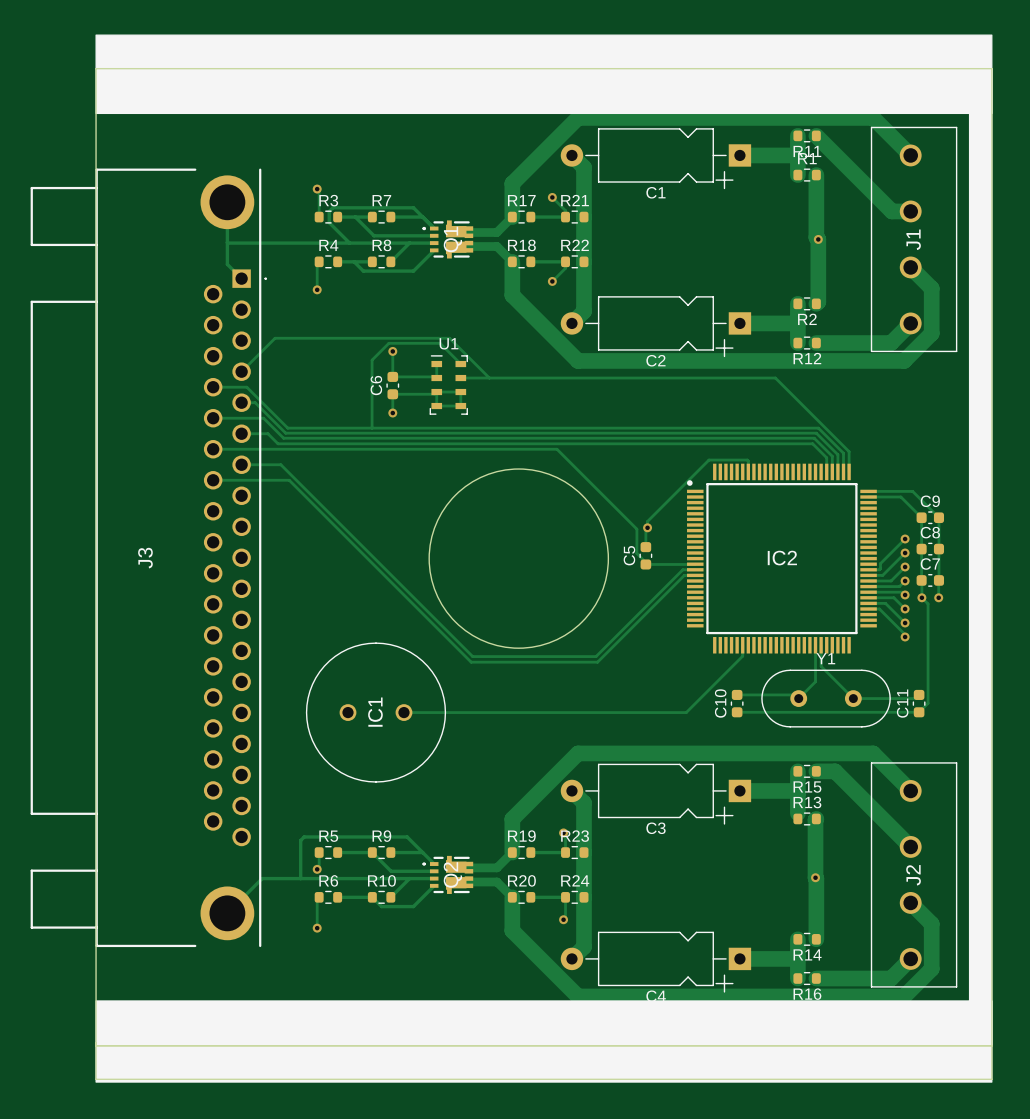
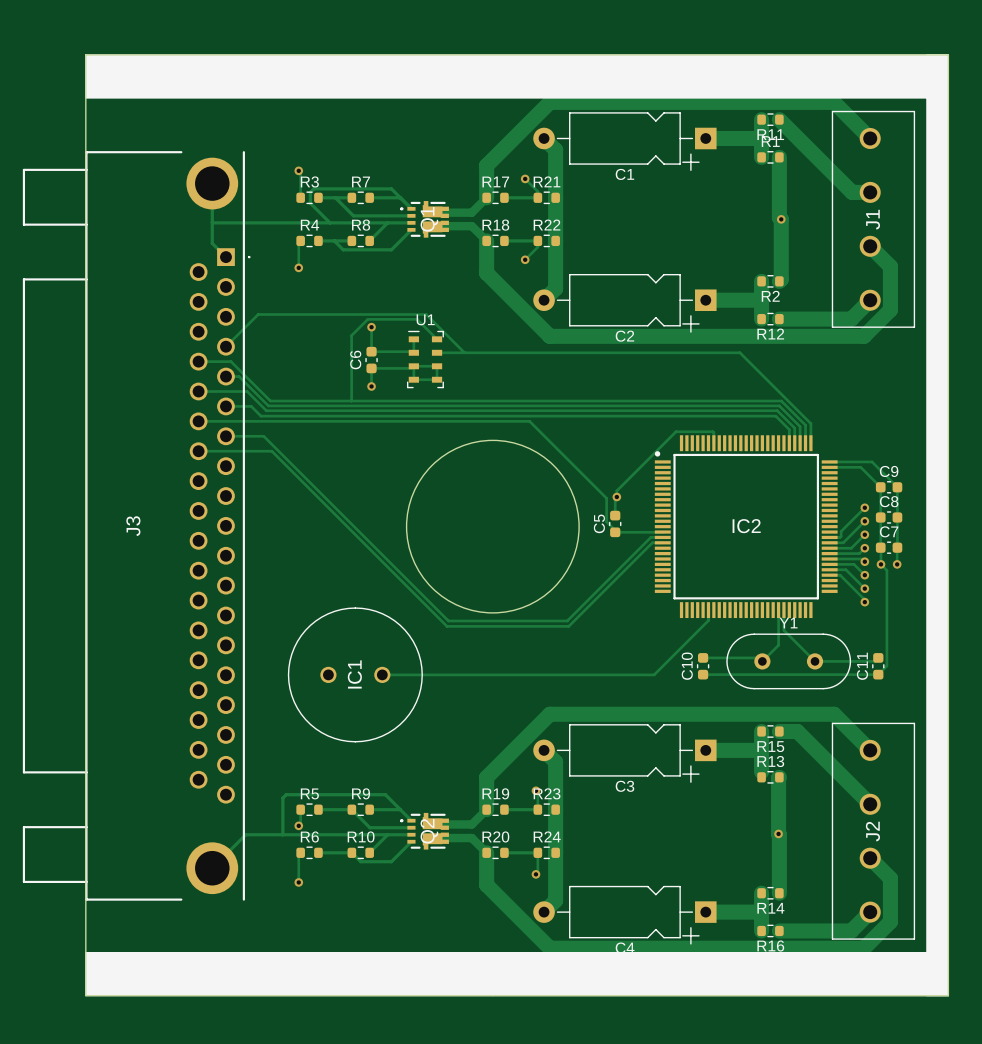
drawing: [95, 34, 993, 115] -> none
drawing: none -> [85, 54, 949, 99]
drawing: [95, 1000, 993, 1083] -> none
drawing: none -> [85, 952, 949, 997]
board edge: (96, 1045) (96, 1079) (991, 1079) (991, 1045) -> none

